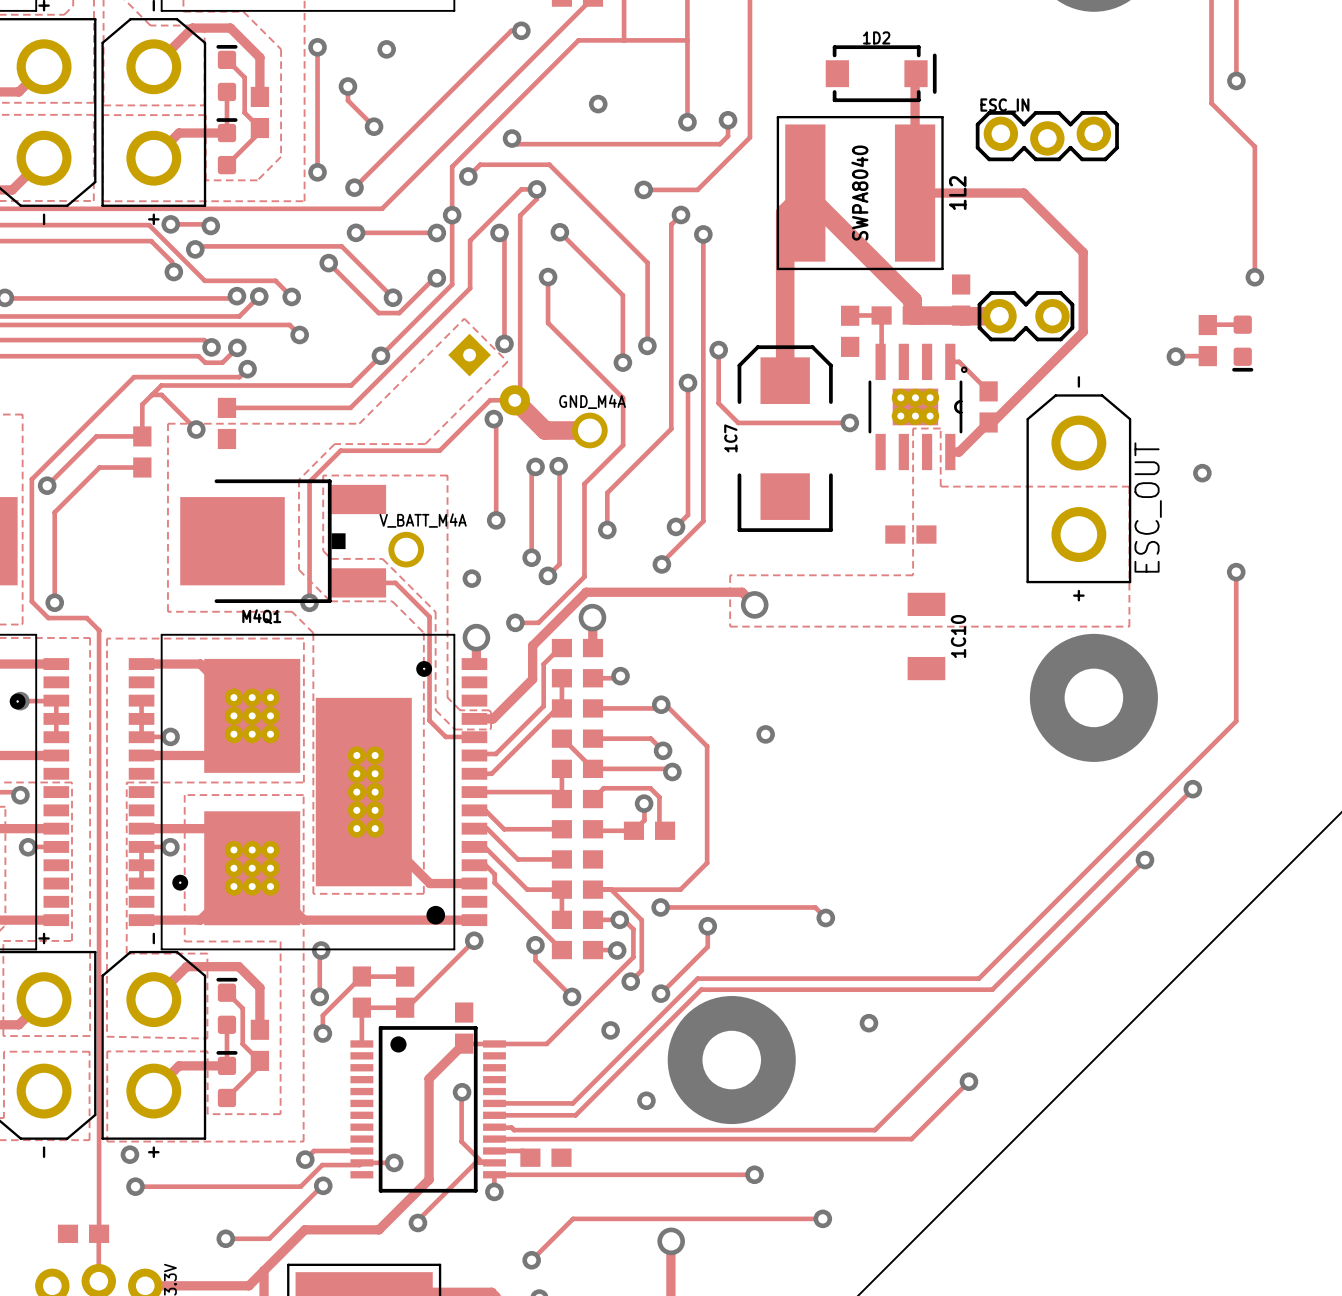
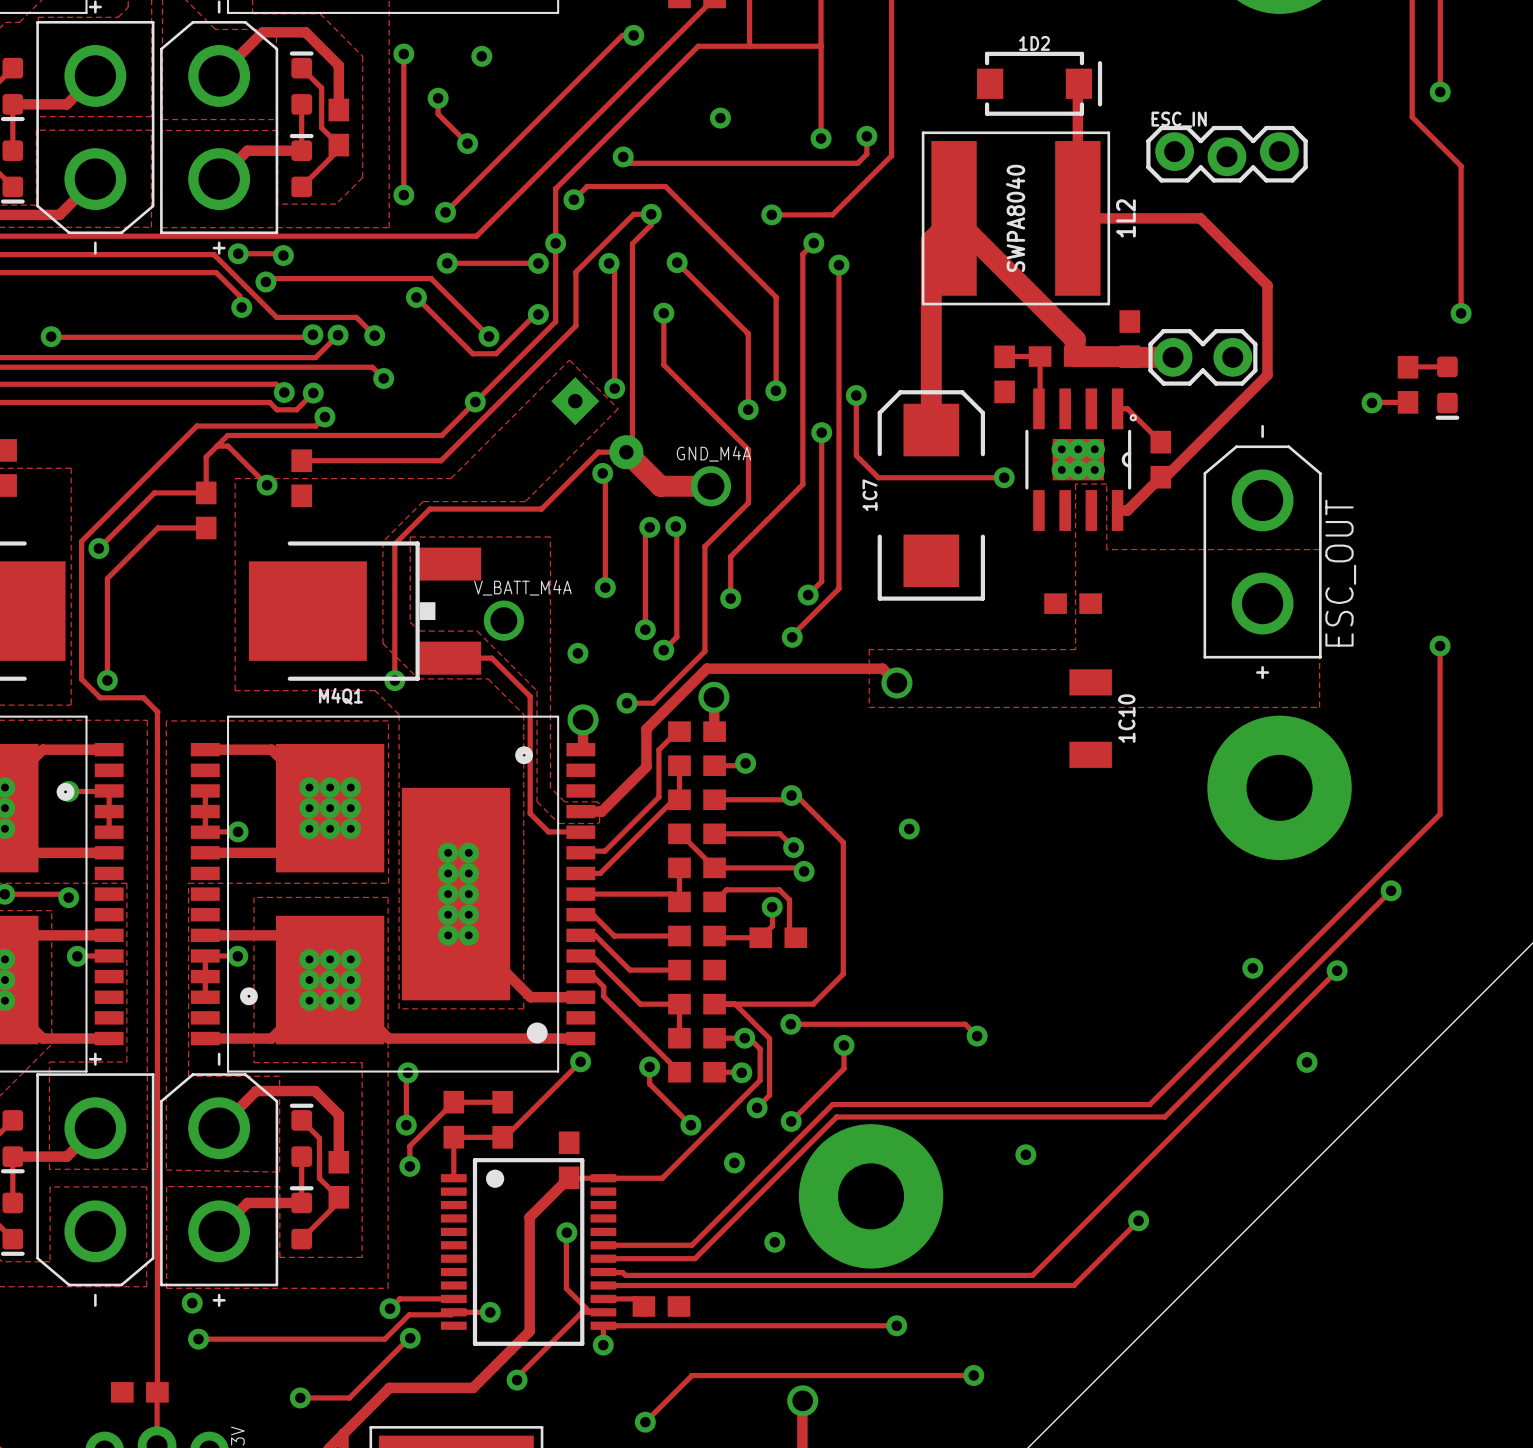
via: (1202, 473) -> none
via: none -> (1252, 968)
via: none -> (1307, 1062)

